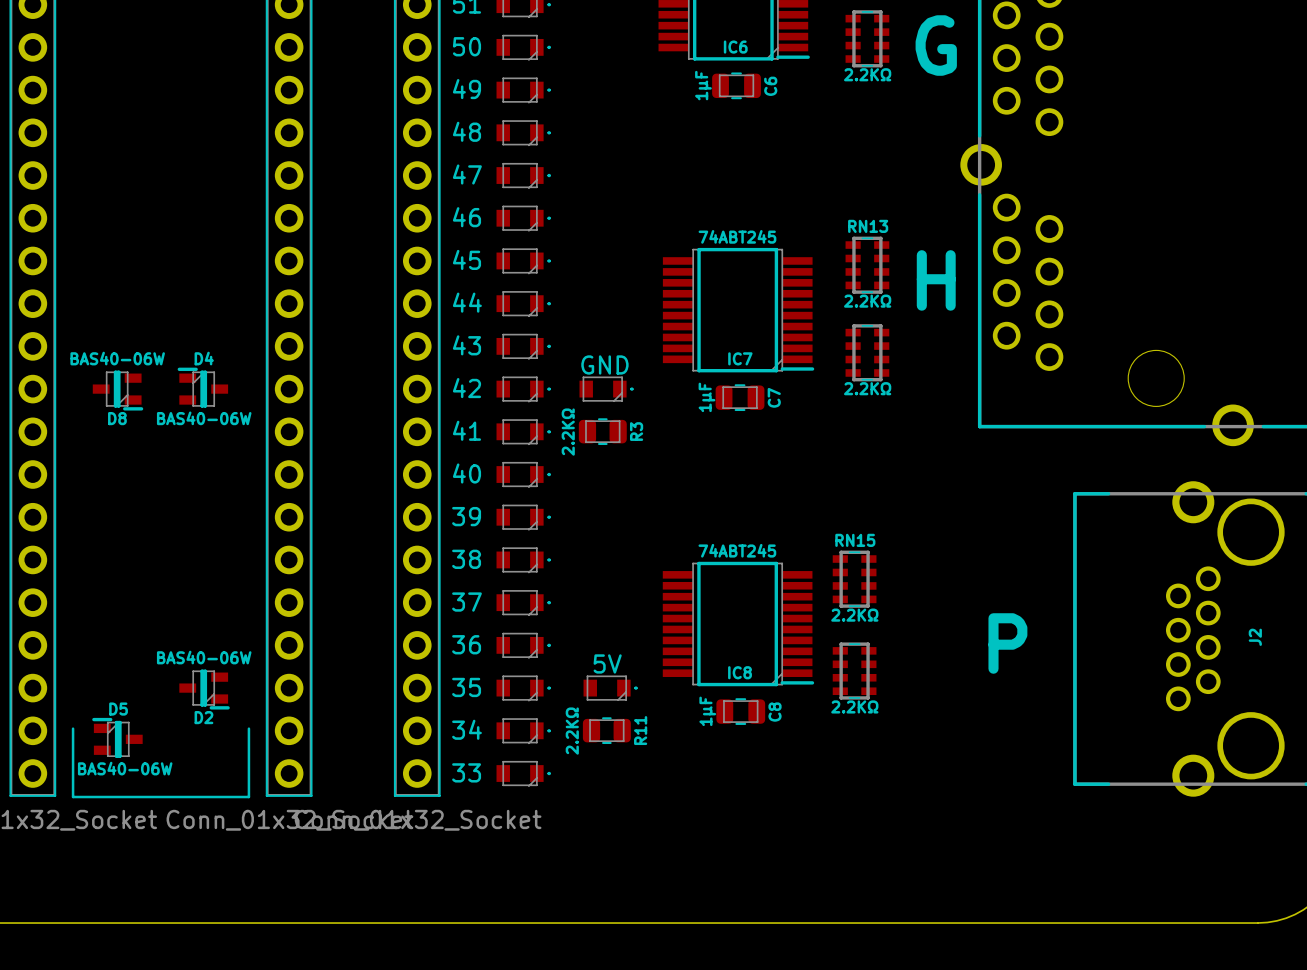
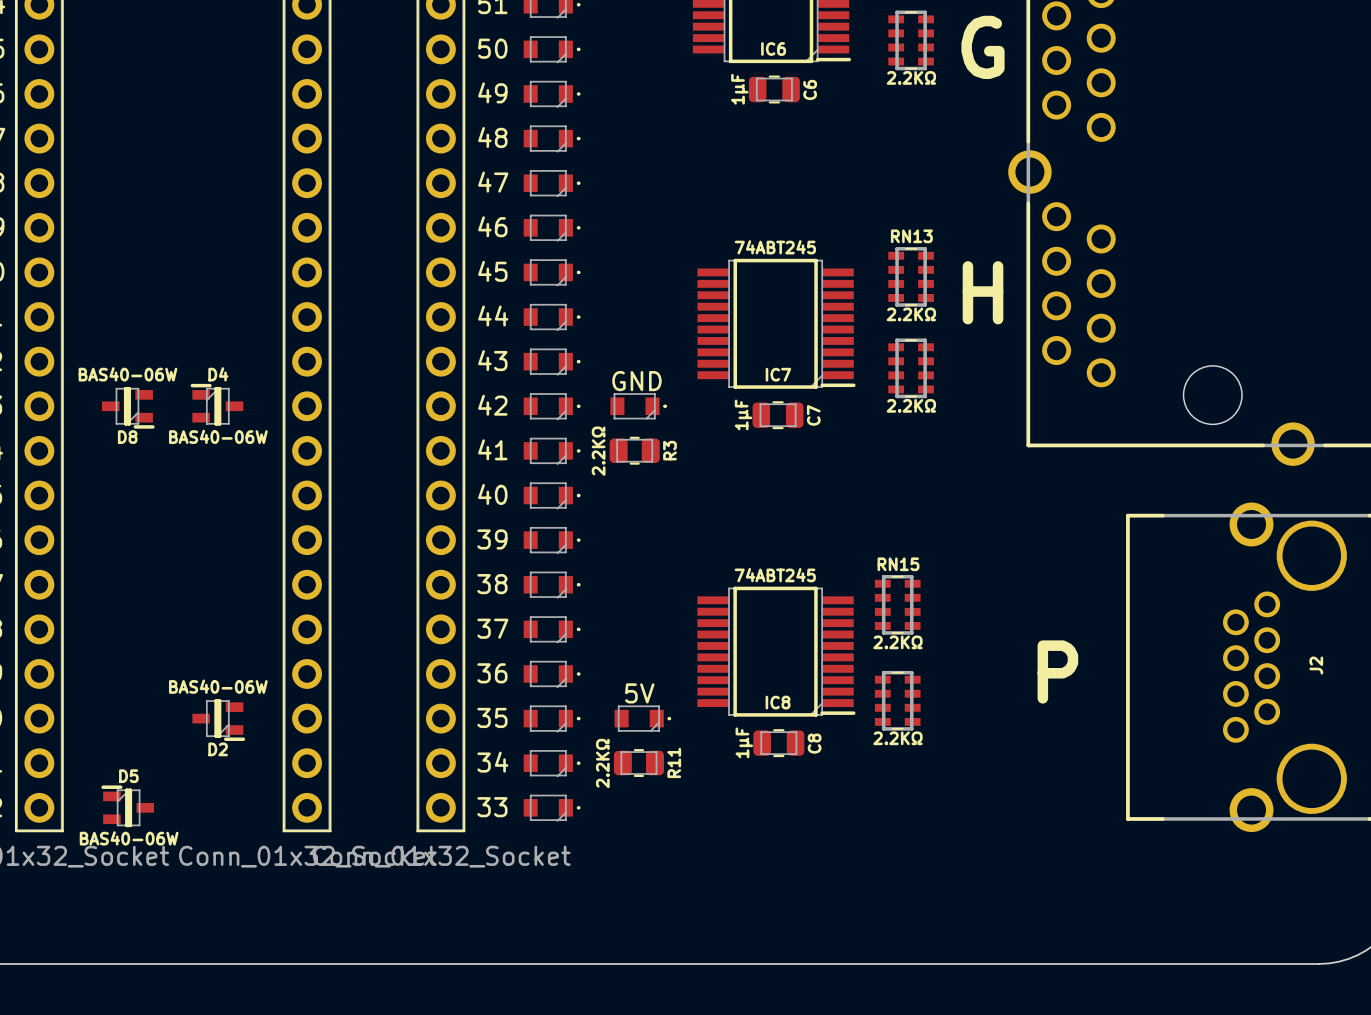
line: (73, 728) (73, 797) (248, 797) (248, 728) -> none
D5 position: (117, 737) -> (127, 806)
D5 text position: BAS40-06W (125, 768) -> BAS40-06W (129, 838)

